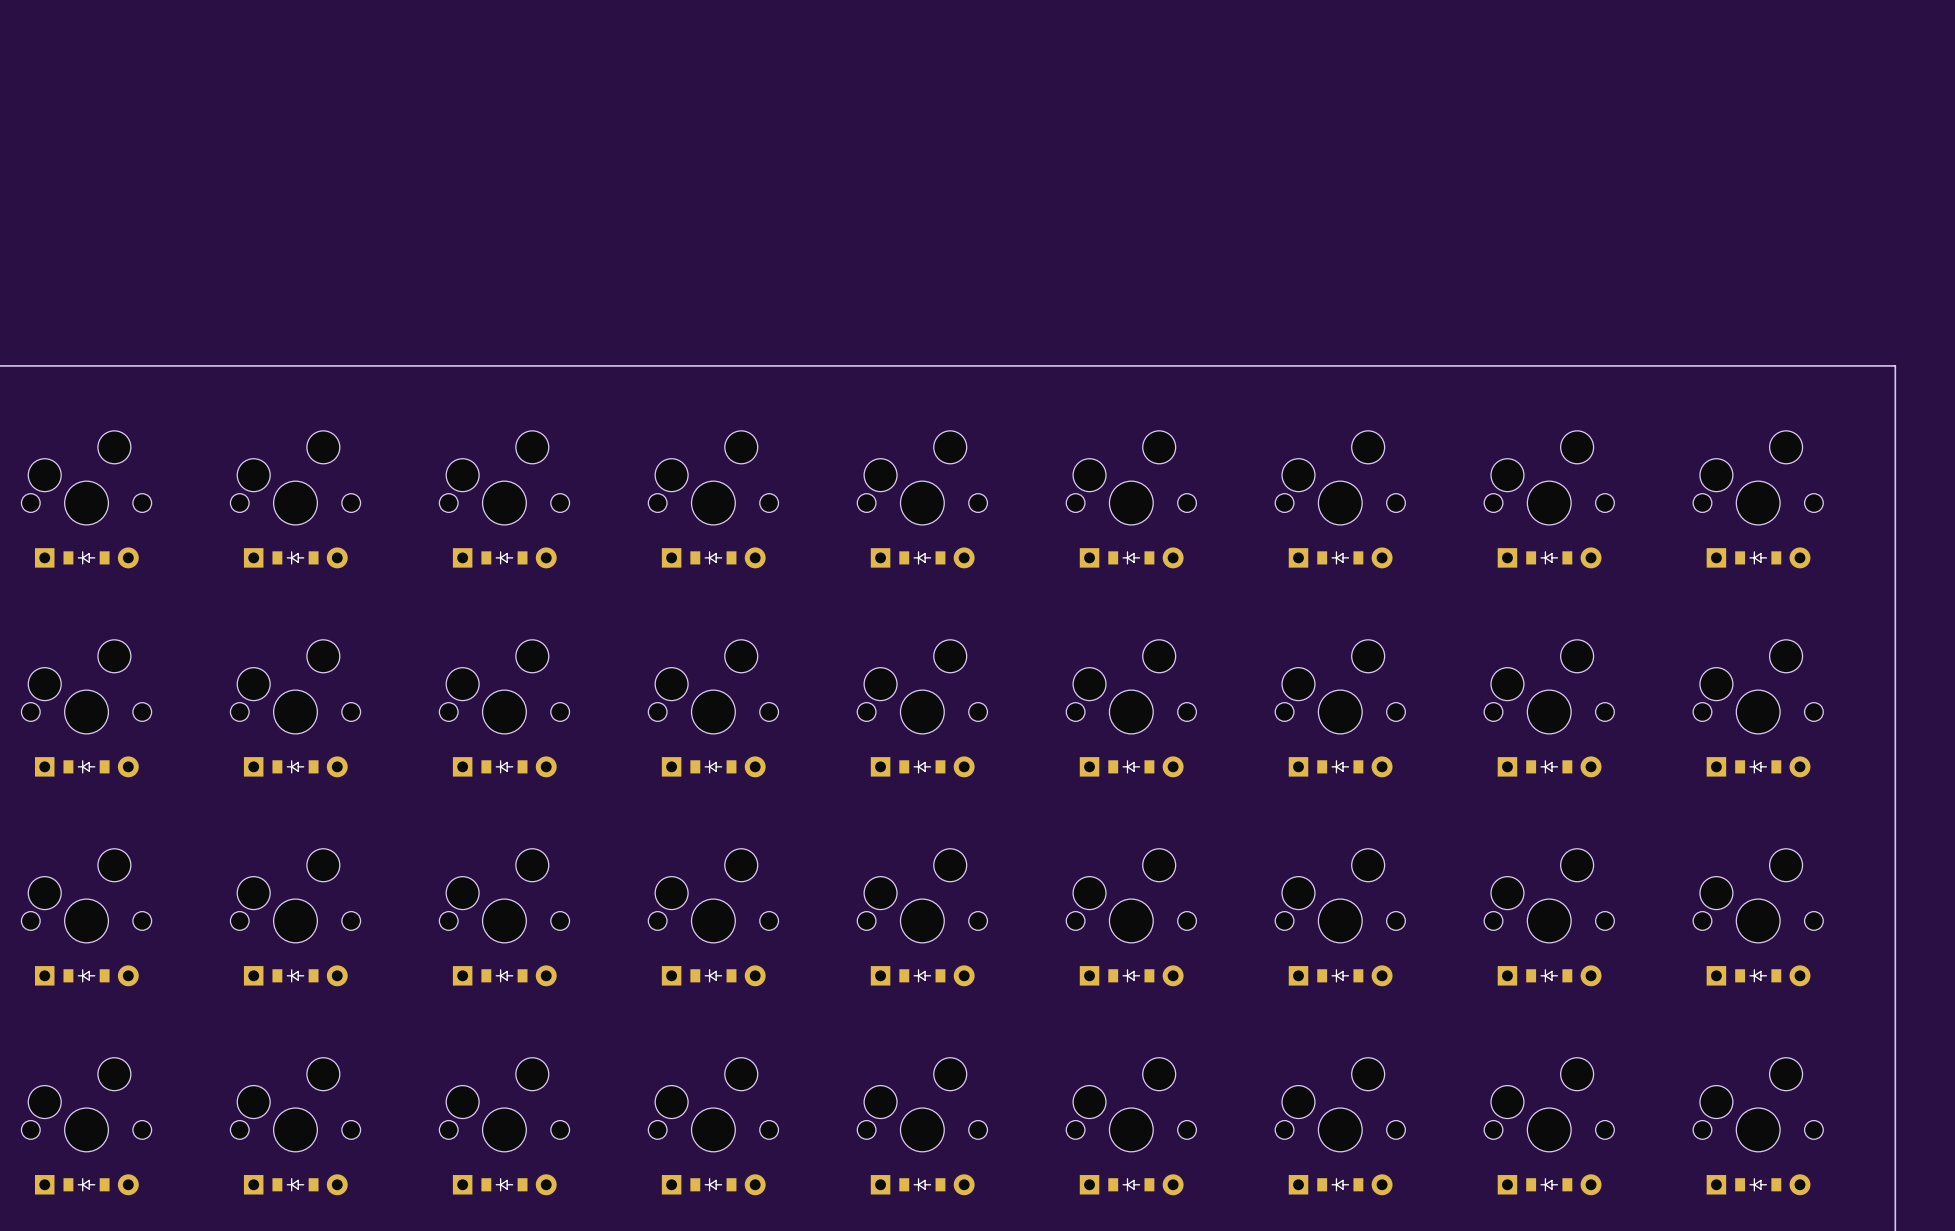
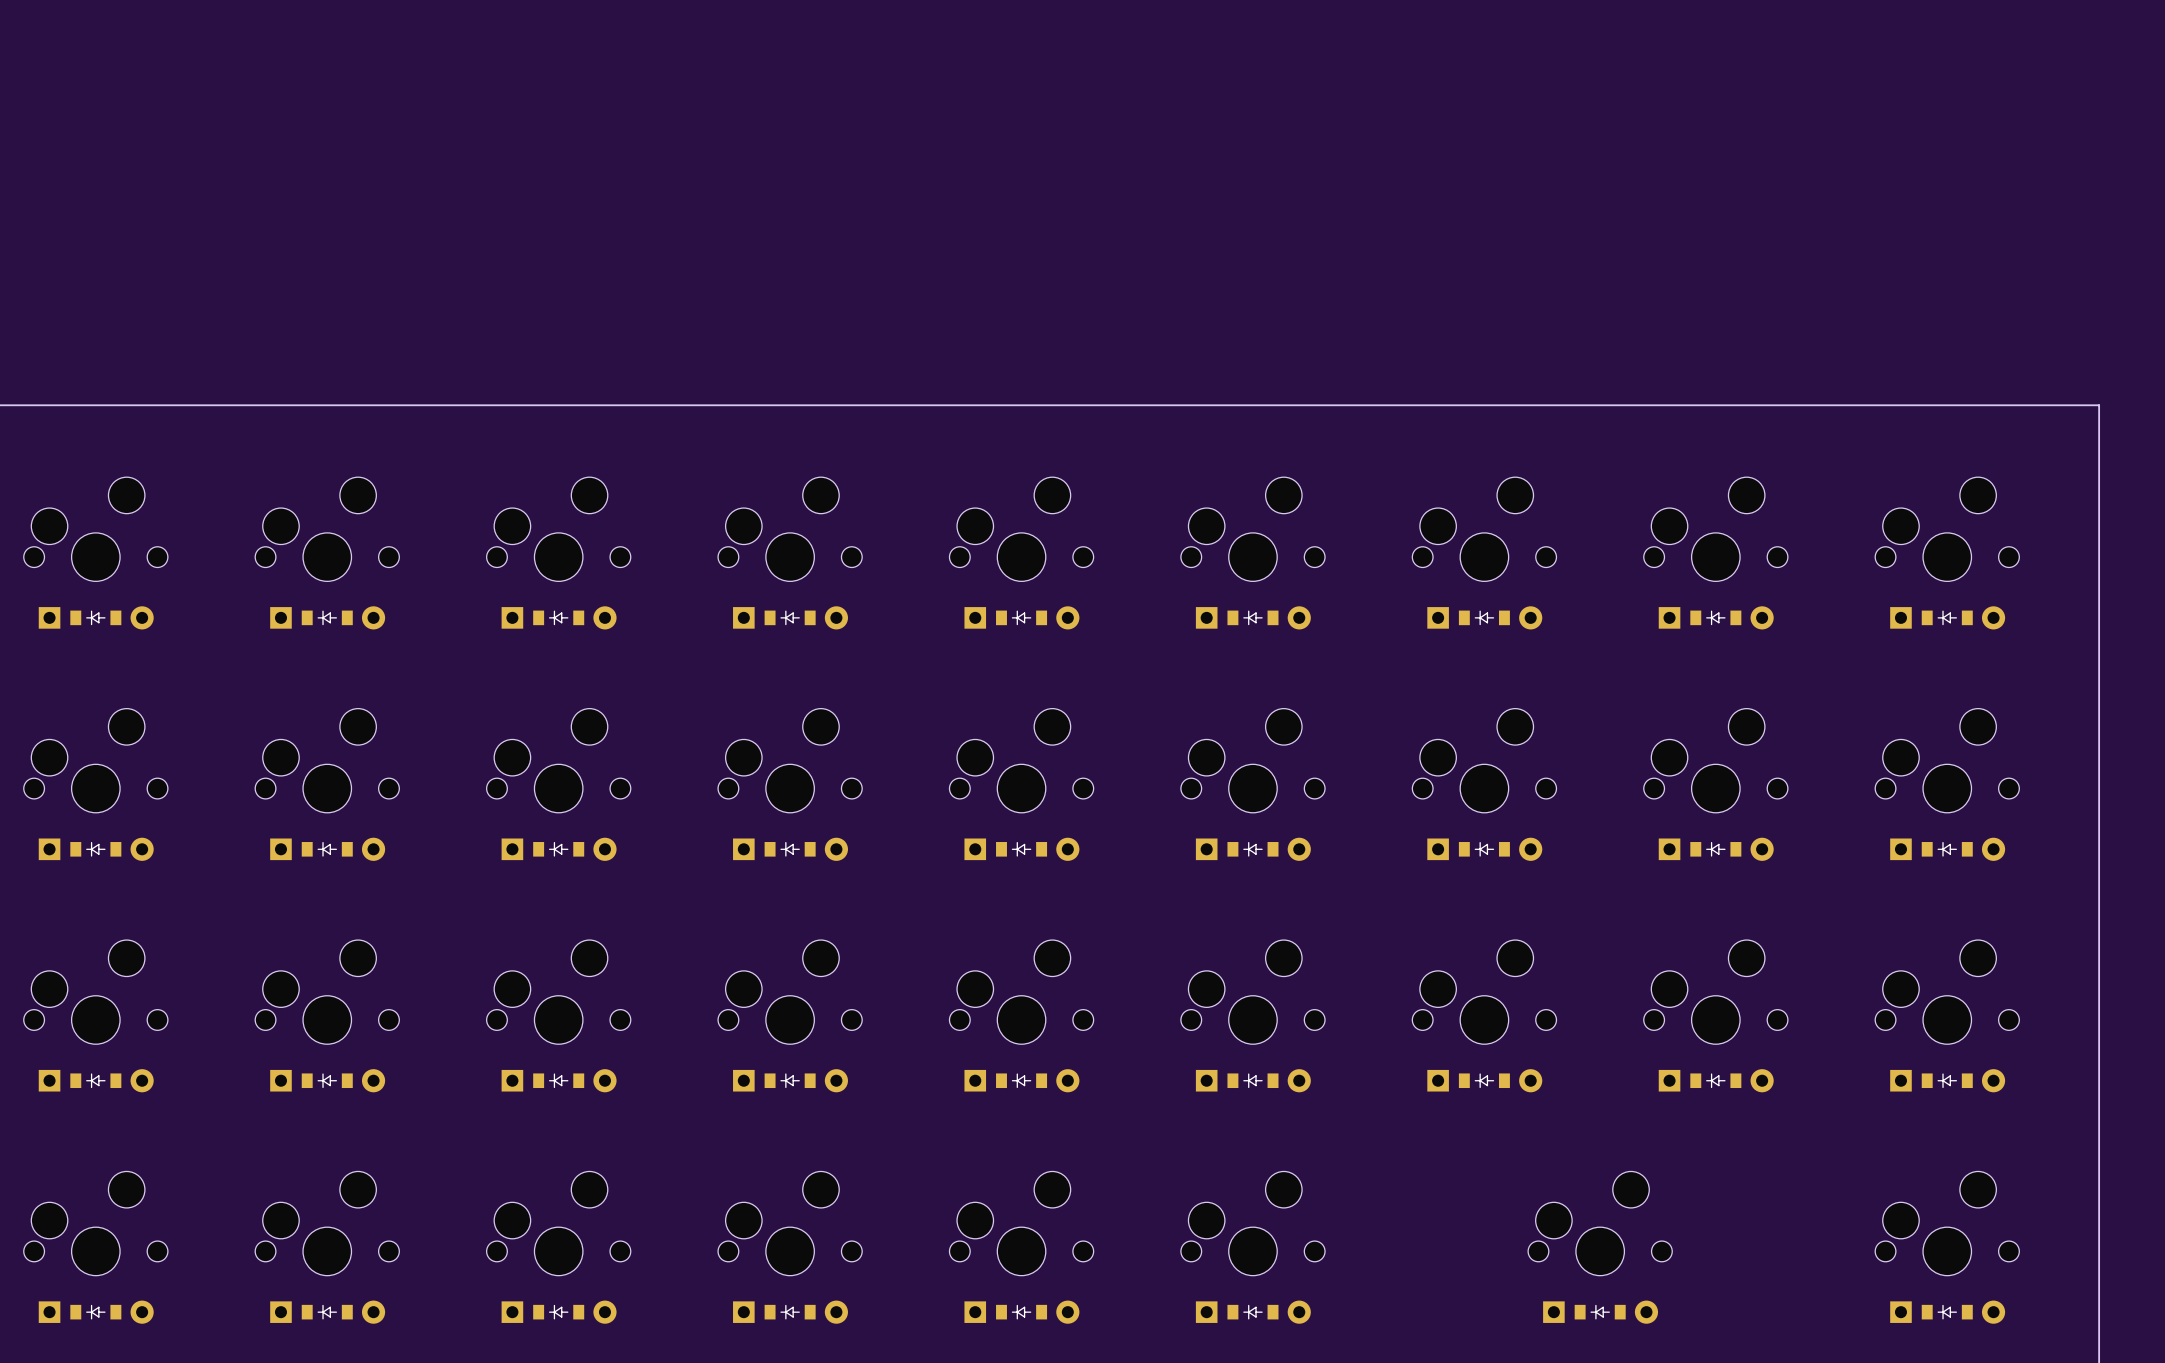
part: (1340, 1104) -> none
part: none -> (1600, 1223)
part: (1549, 1104) -> none
part: (1340, 1184) -> none
part: none -> (1600, 1312)
part: (1549, 1184) -> none

